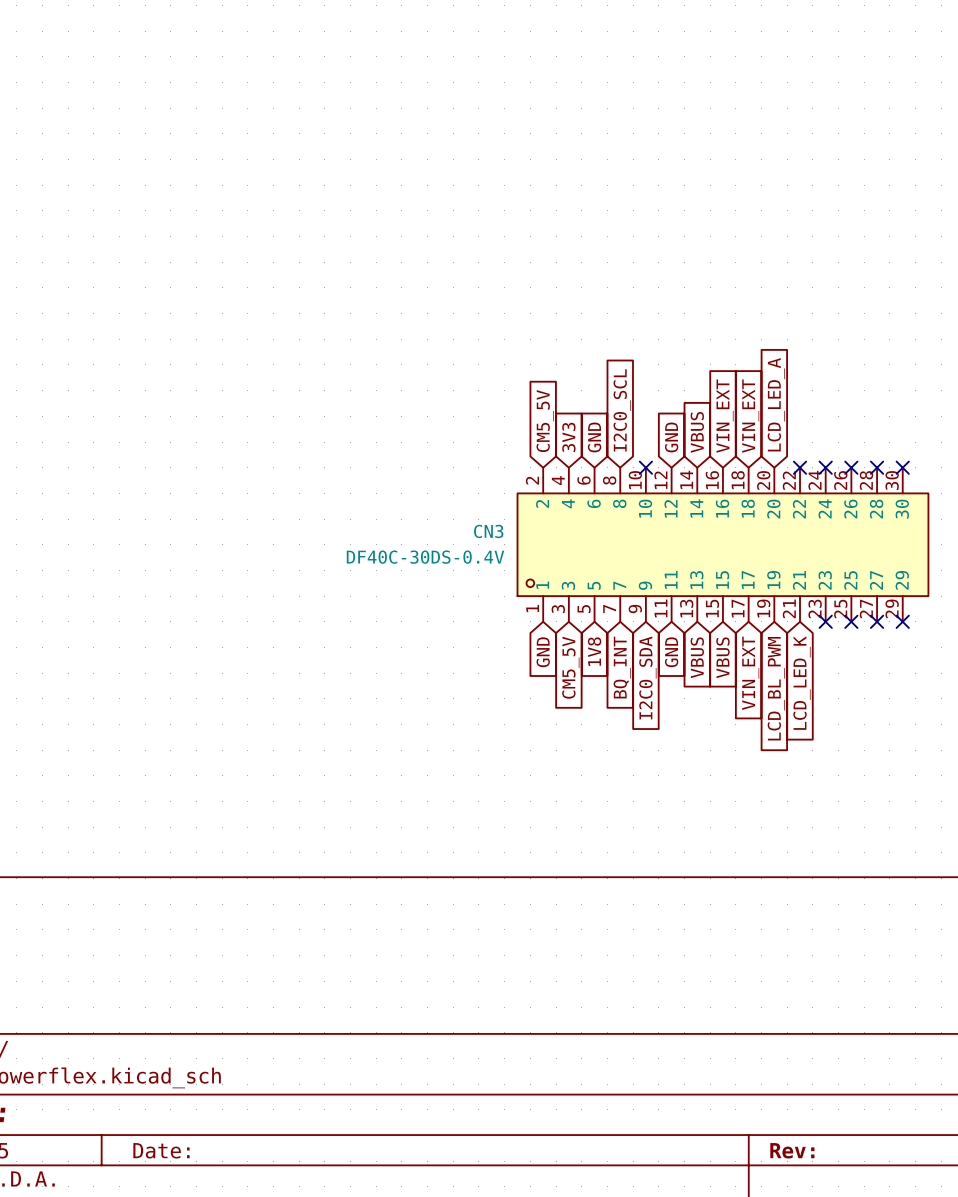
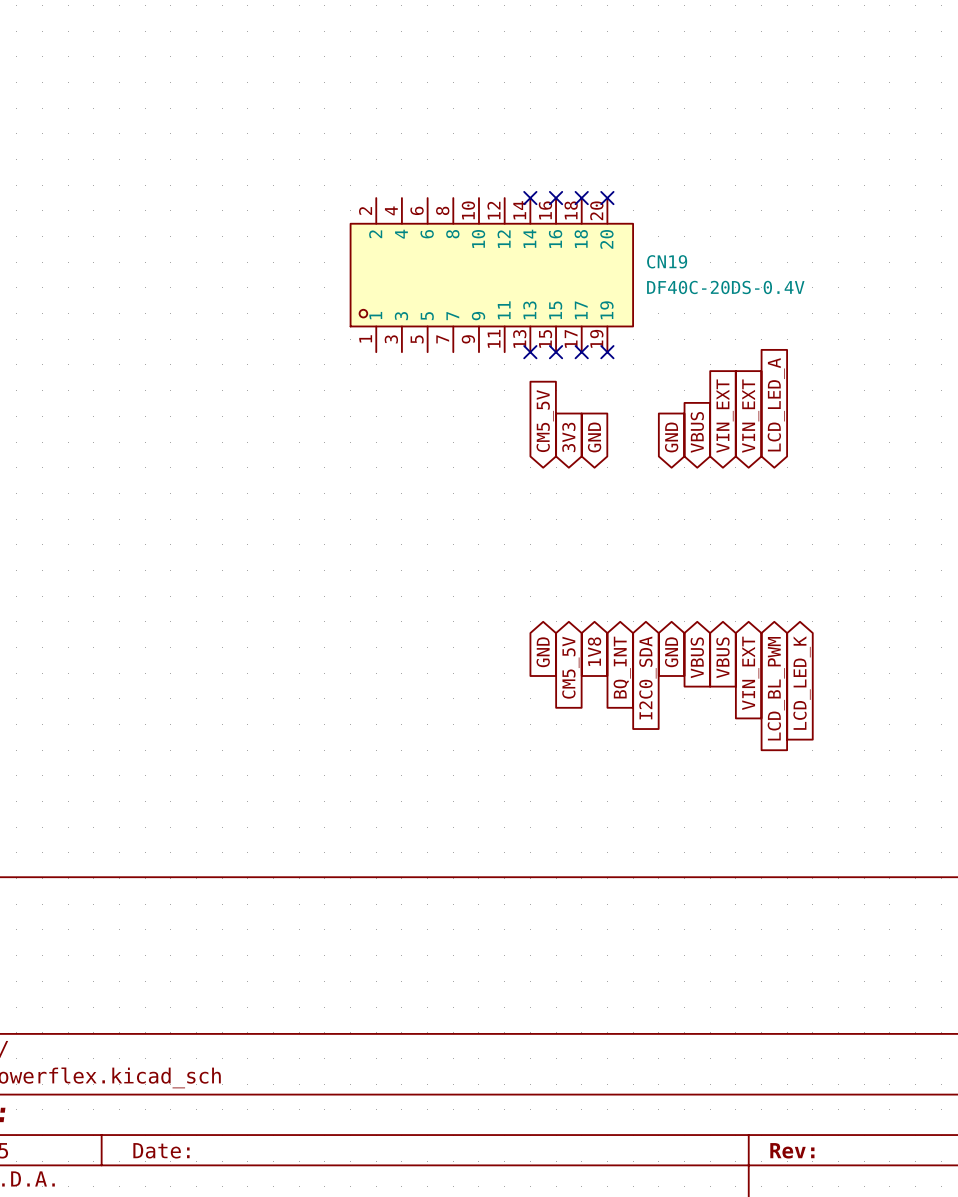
no-connect mark: none -> (530, 198)
no-connect mark: none -> (556, 198)
no-connect mark: none -> (581, 198)
no-connect mark: none -> (607, 198)
CN19: none -> DF40C-20DS-0.4V (491, 275)
no-connect mark: none -> (530, 352)
no-connect mark: none -> (556, 352)
no-connect mark: none -> (581, 352)
no-connect mark: none -> (607, 352)
global label: I2C0_SCL (622, 410) -> none
no-connect mark: (645, 467) -> none
no-connect mark: (800, 467) -> none
no-connect mark: (825, 467) -> none
no-connect mark: (851, 467) -> none
no-connect mark: (877, 467) -> none
no-connect mark: (902, 467) -> none
CN3: DF40C-30DS-0.4V (722, 544) -> none
no-connect mark: (825, 621) -> none
no-connect mark: (851, 621) -> none
no-connect mark: (877, 621) -> none
no-connect mark: (902, 621) -> none

